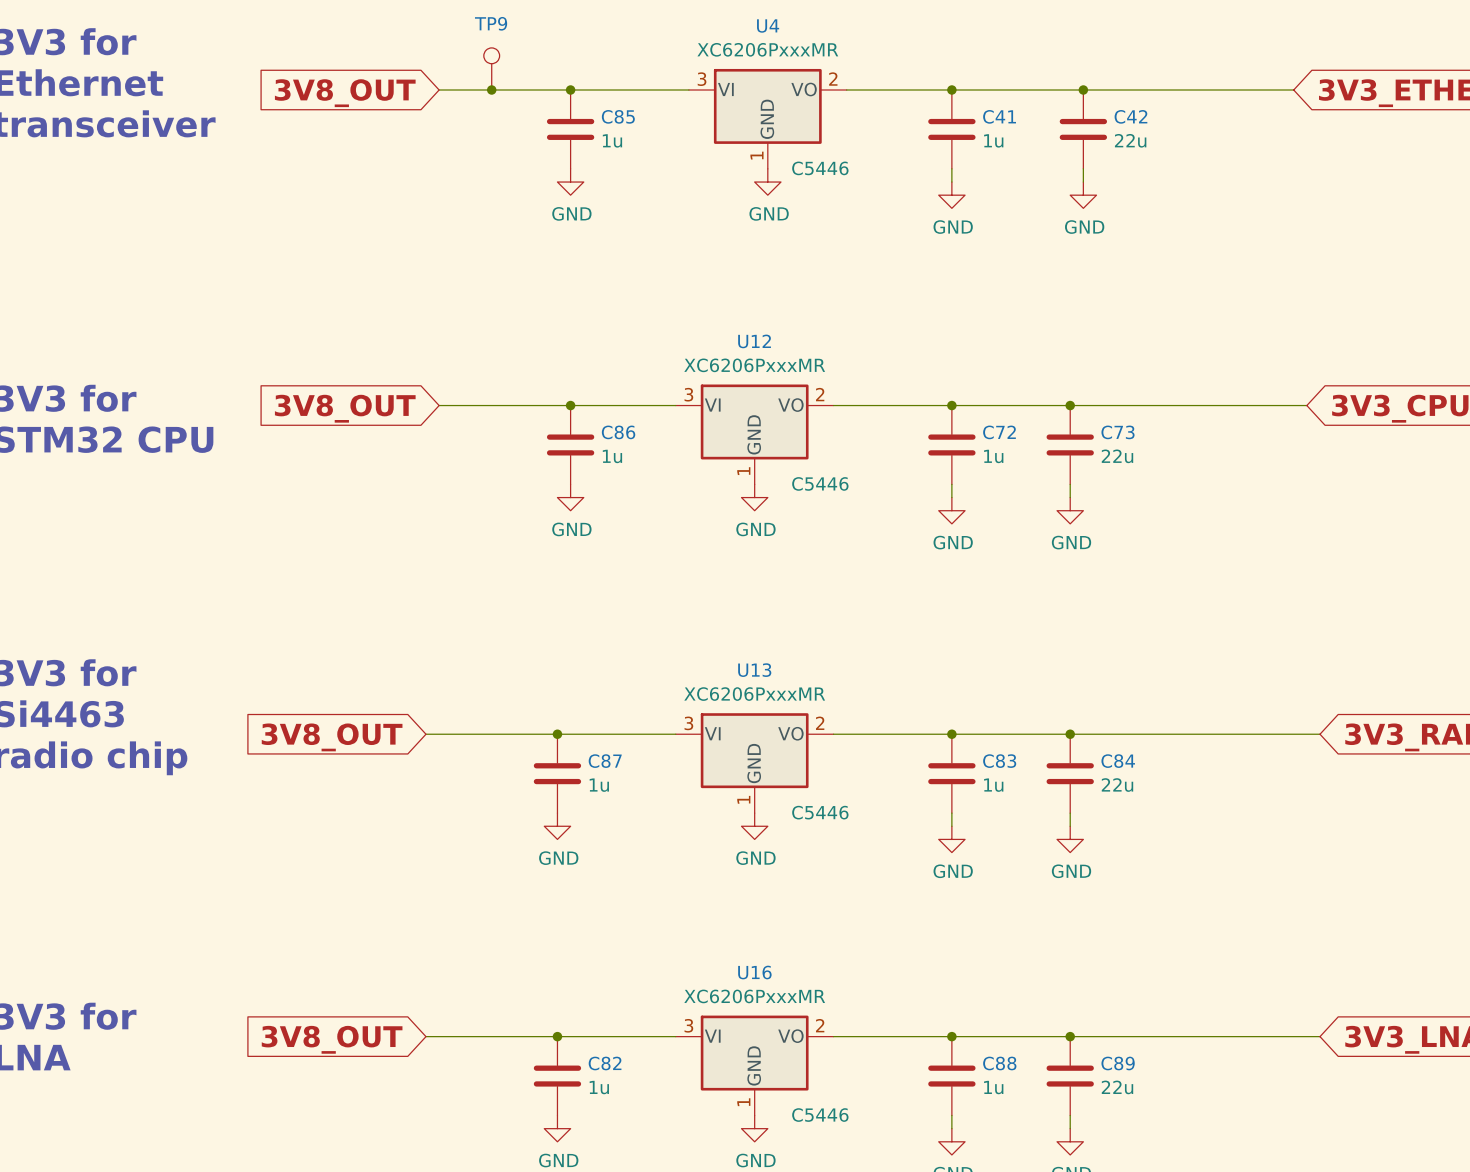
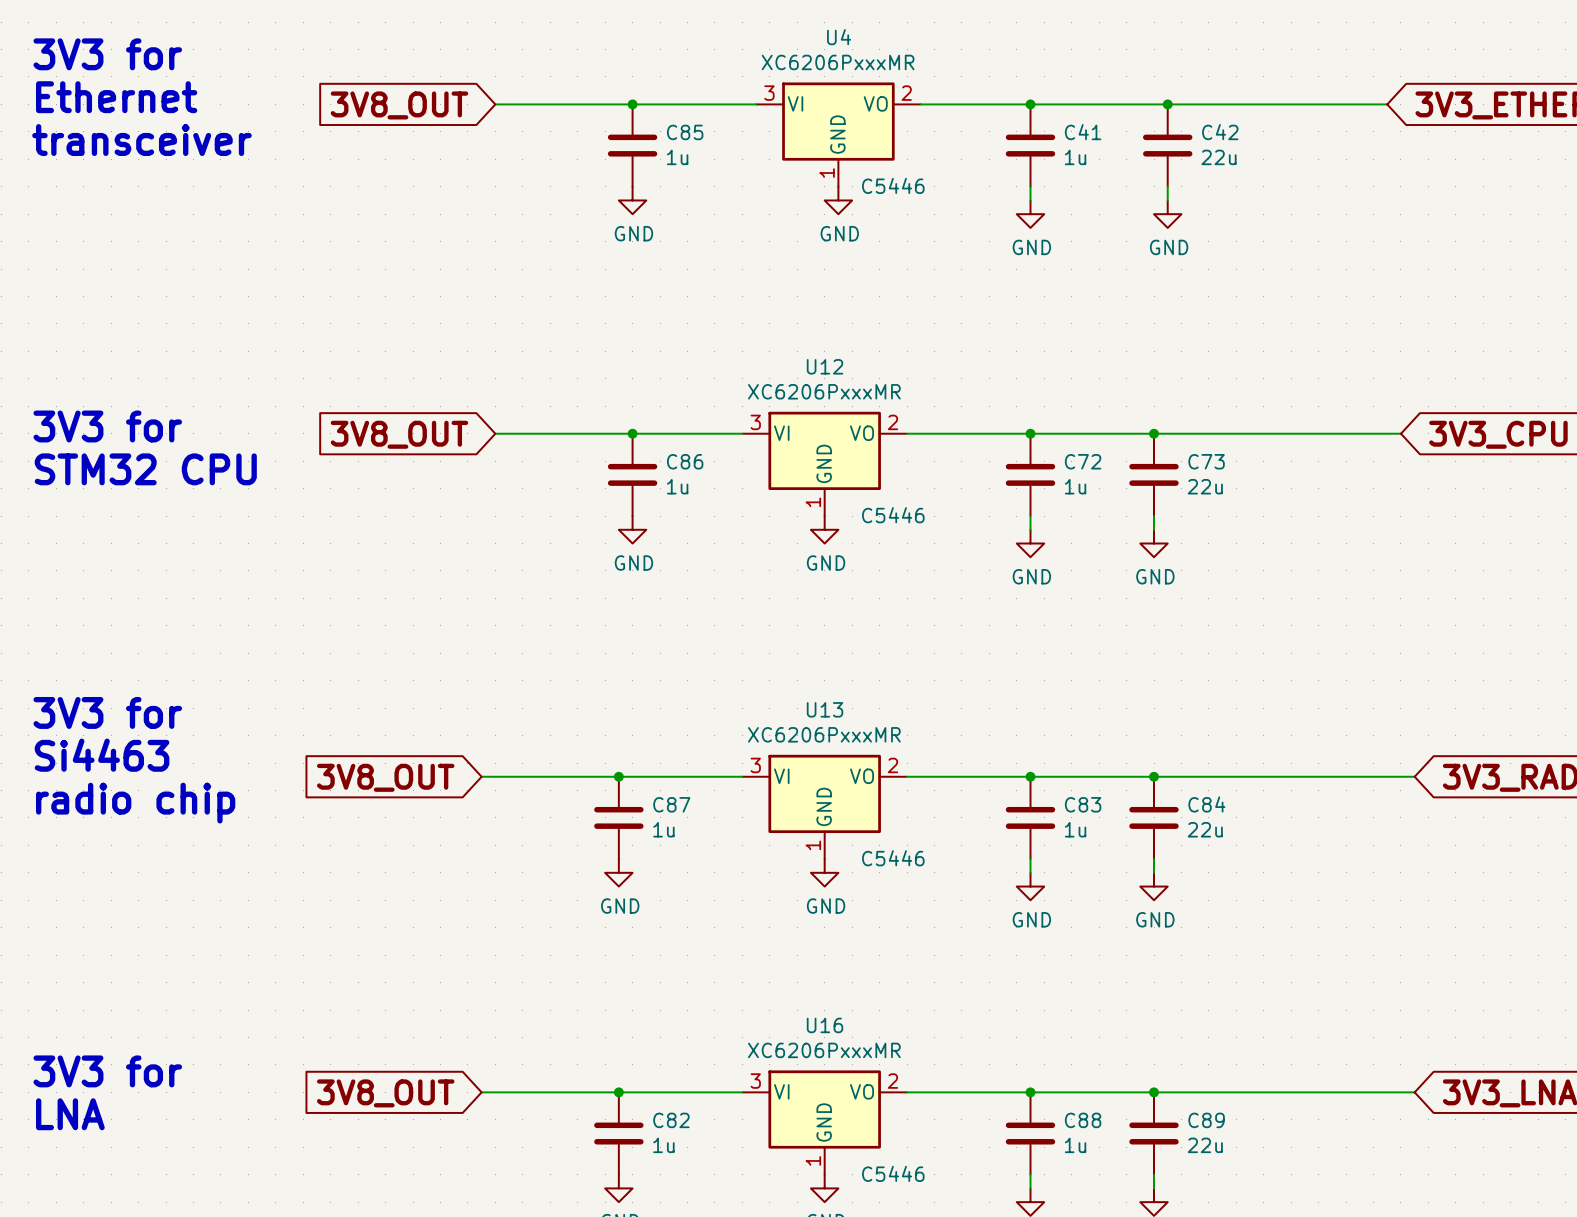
TP9: (491, 68) -> none
junction: (491, 90) -> none

